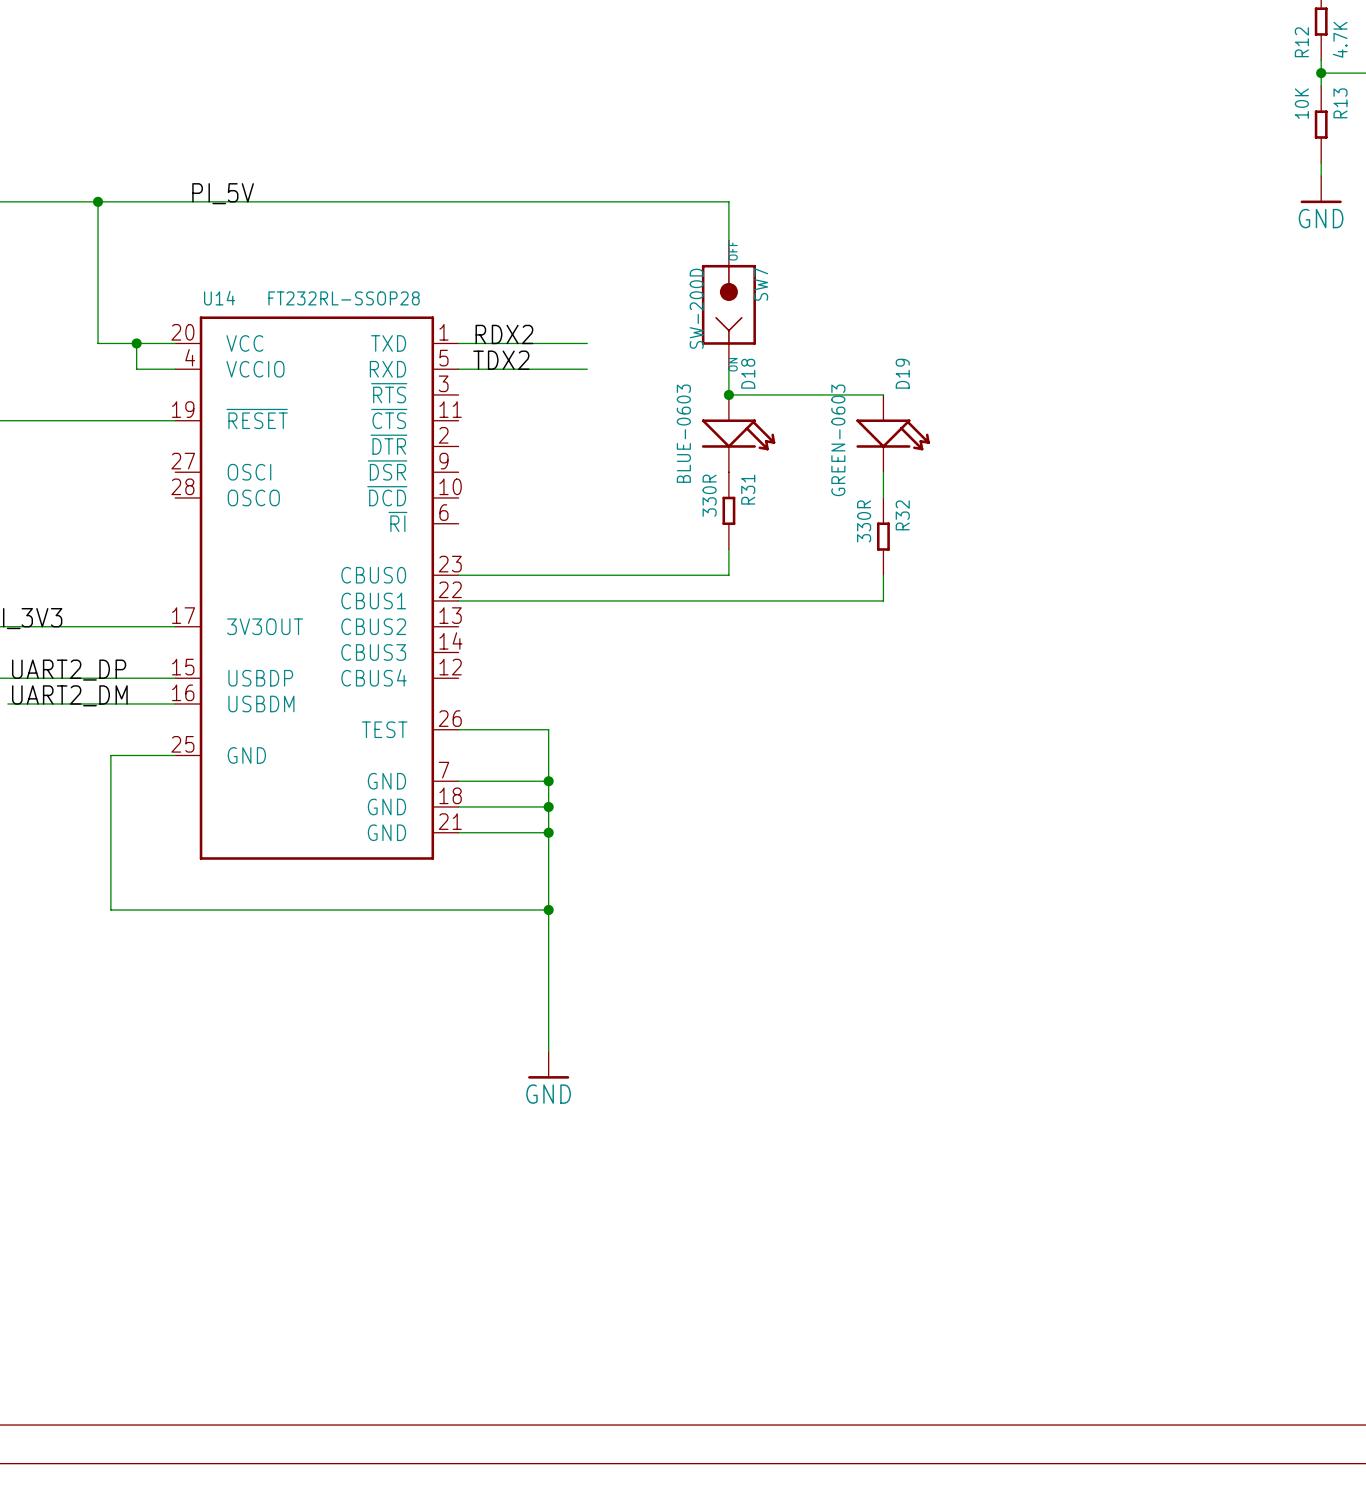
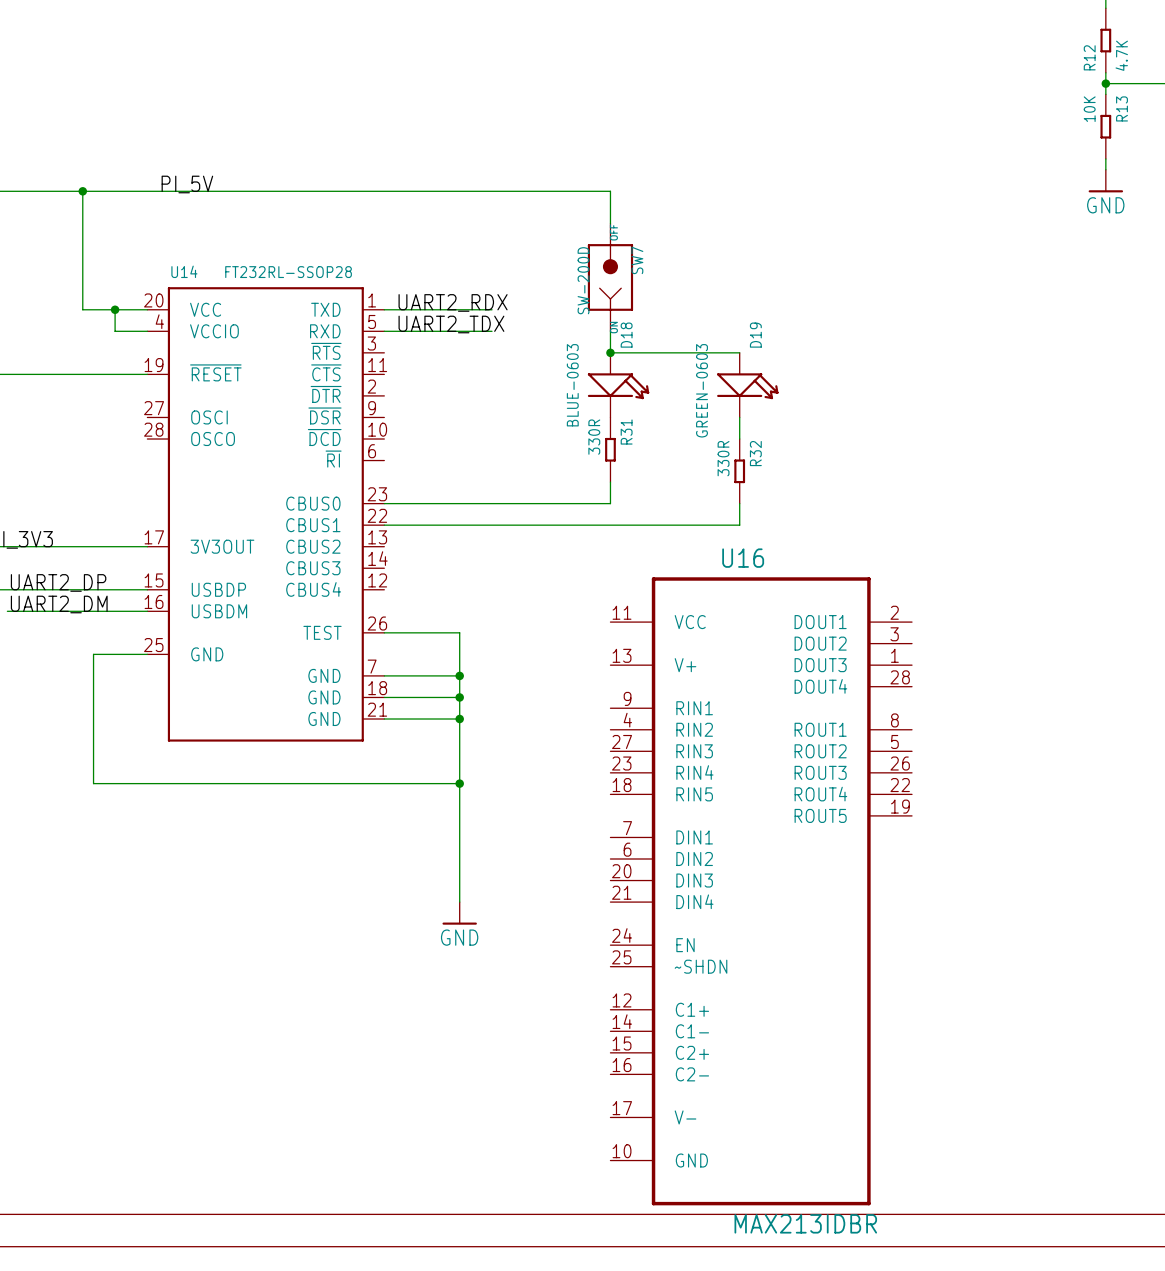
label: RDX2 (504, 334) -> UART2_RDX (453, 302)
label: TDX2 (501, 360) -> UART2_TDX (451, 324)
U16: none -> MAX213IDBR (761, 891)

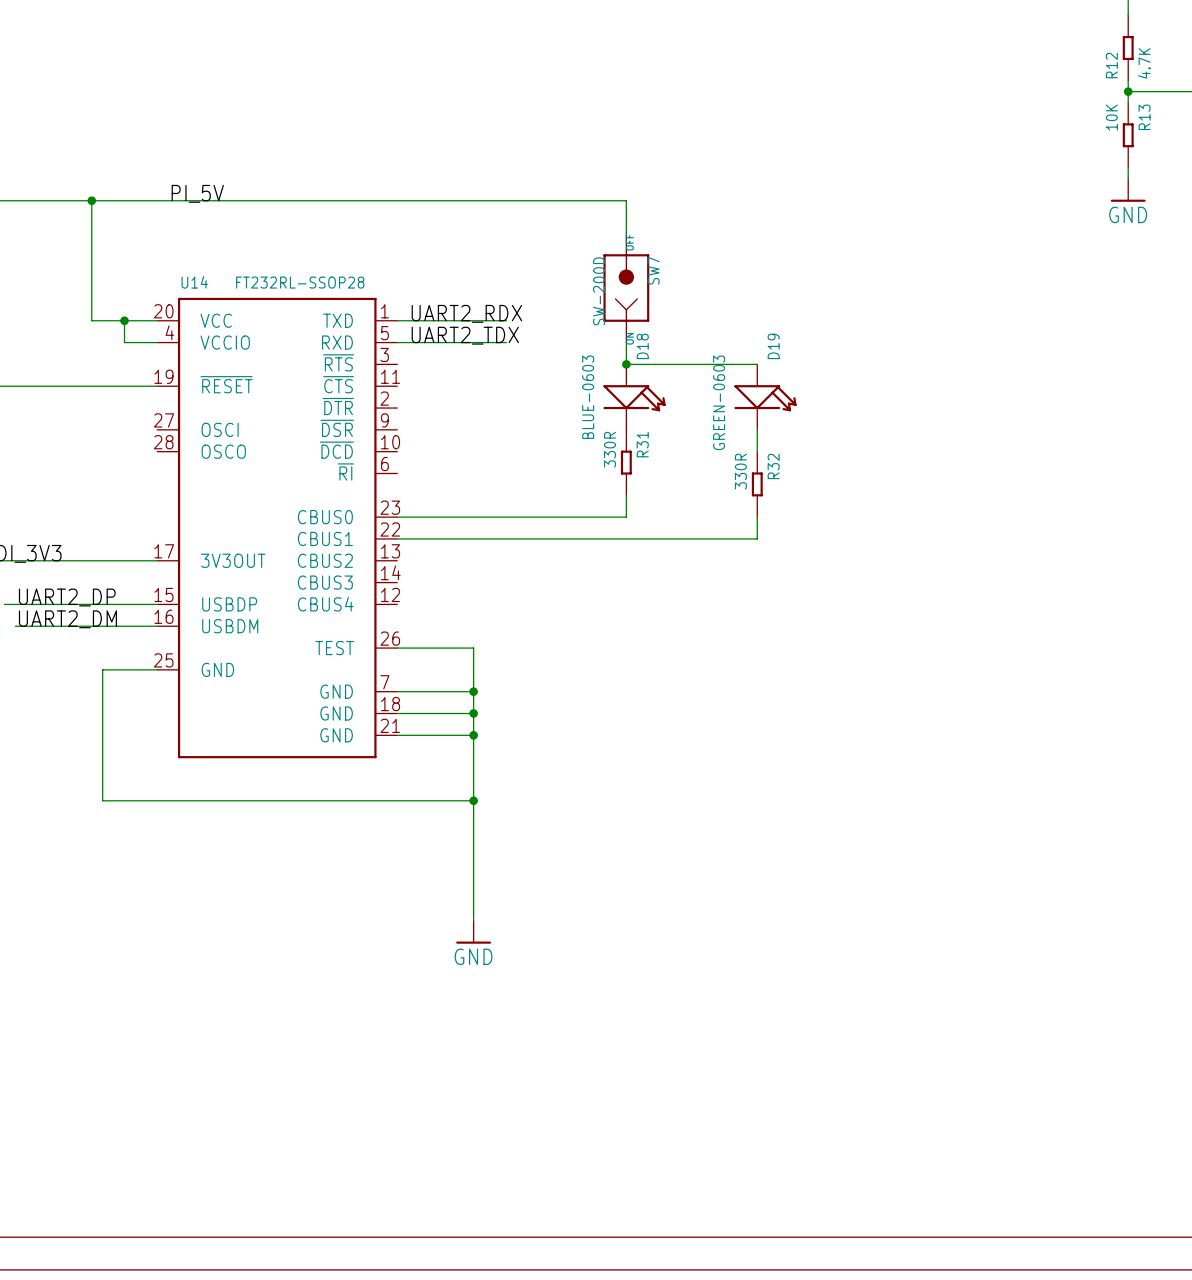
U16: MAX213IDBR (761, 891) -> none

